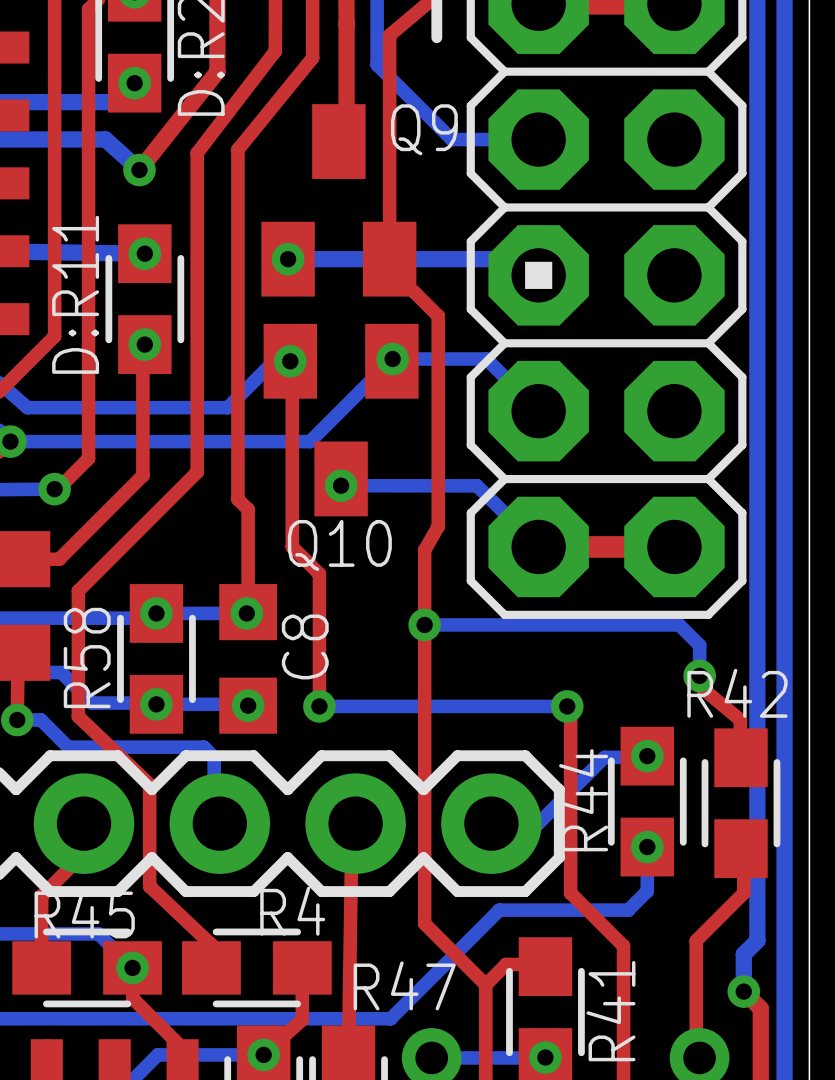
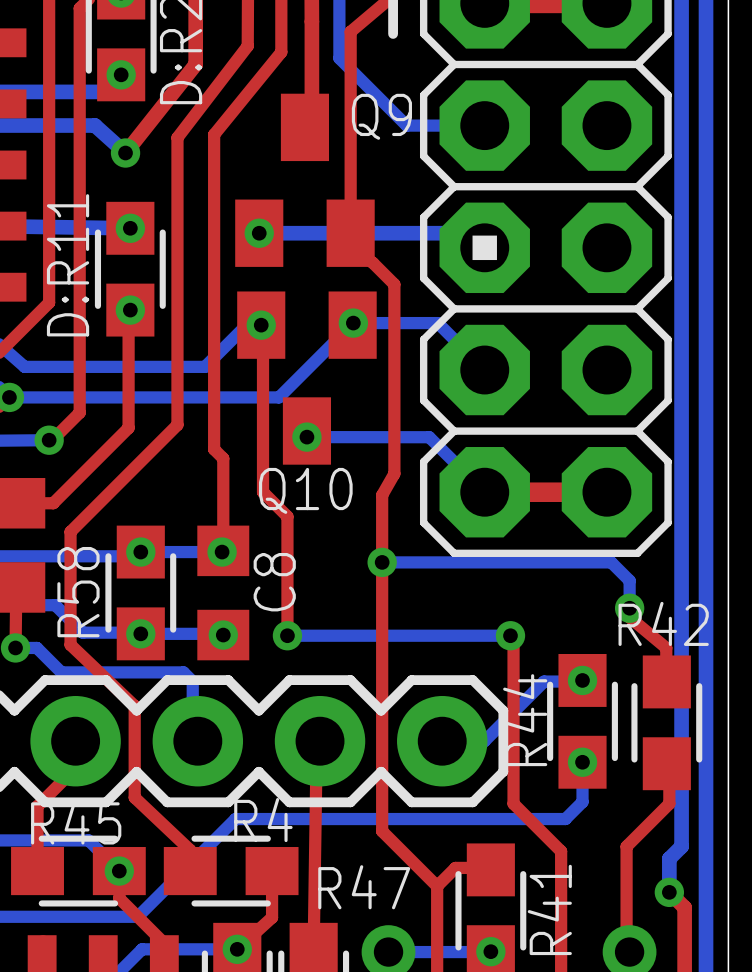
bottom track: (499, 910) (390, 1018) (153, 1018) -> (449, 819) (235, 819) (137, 916)

